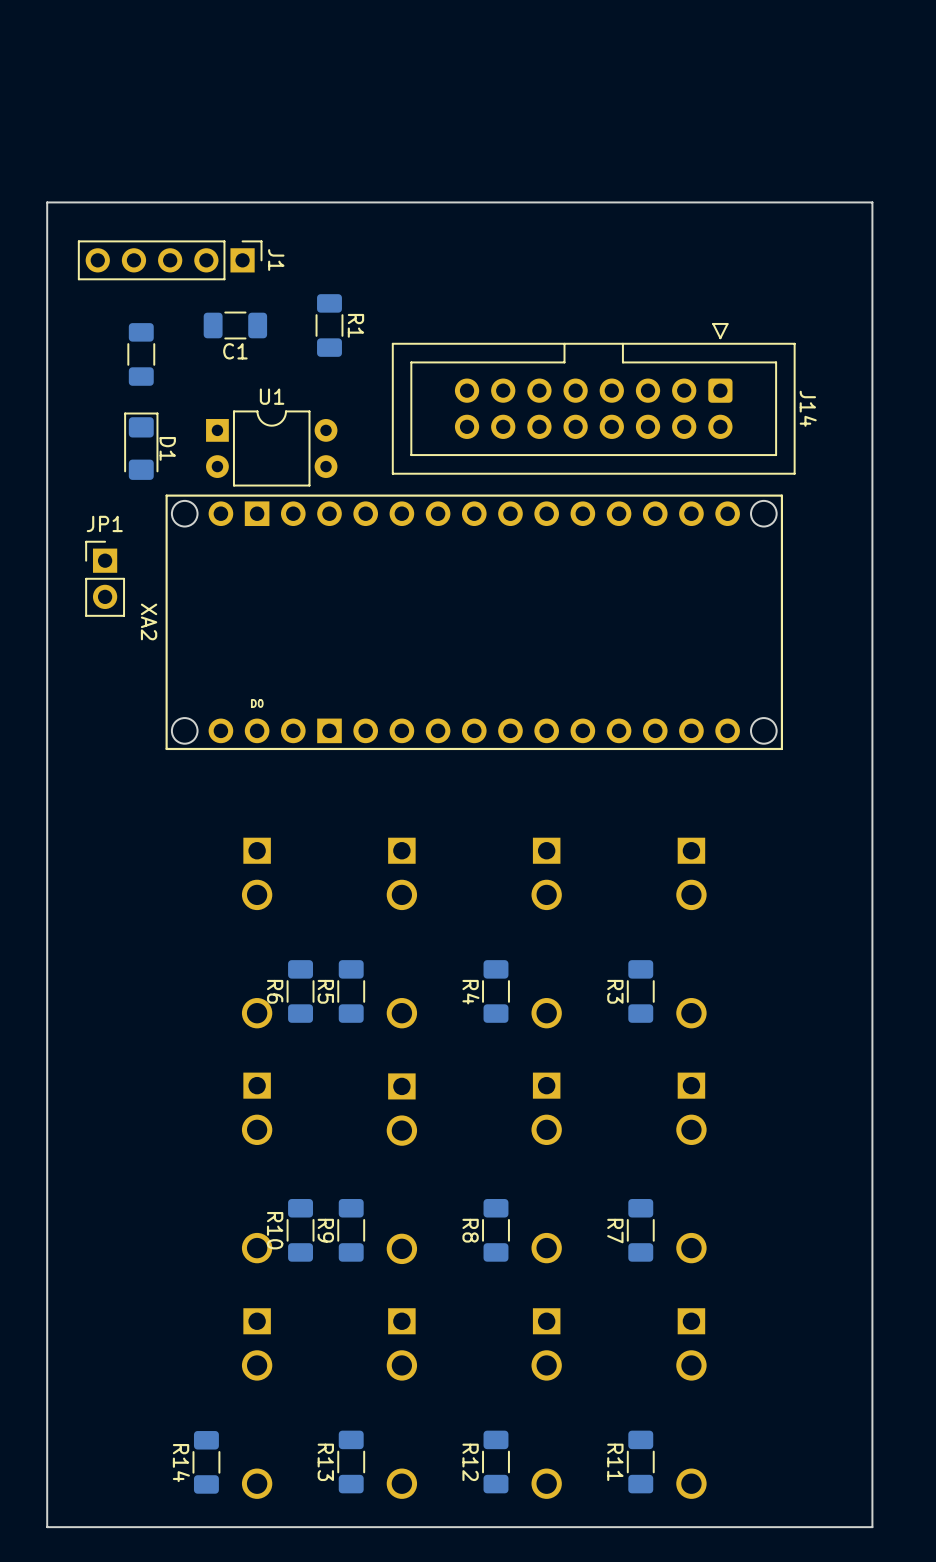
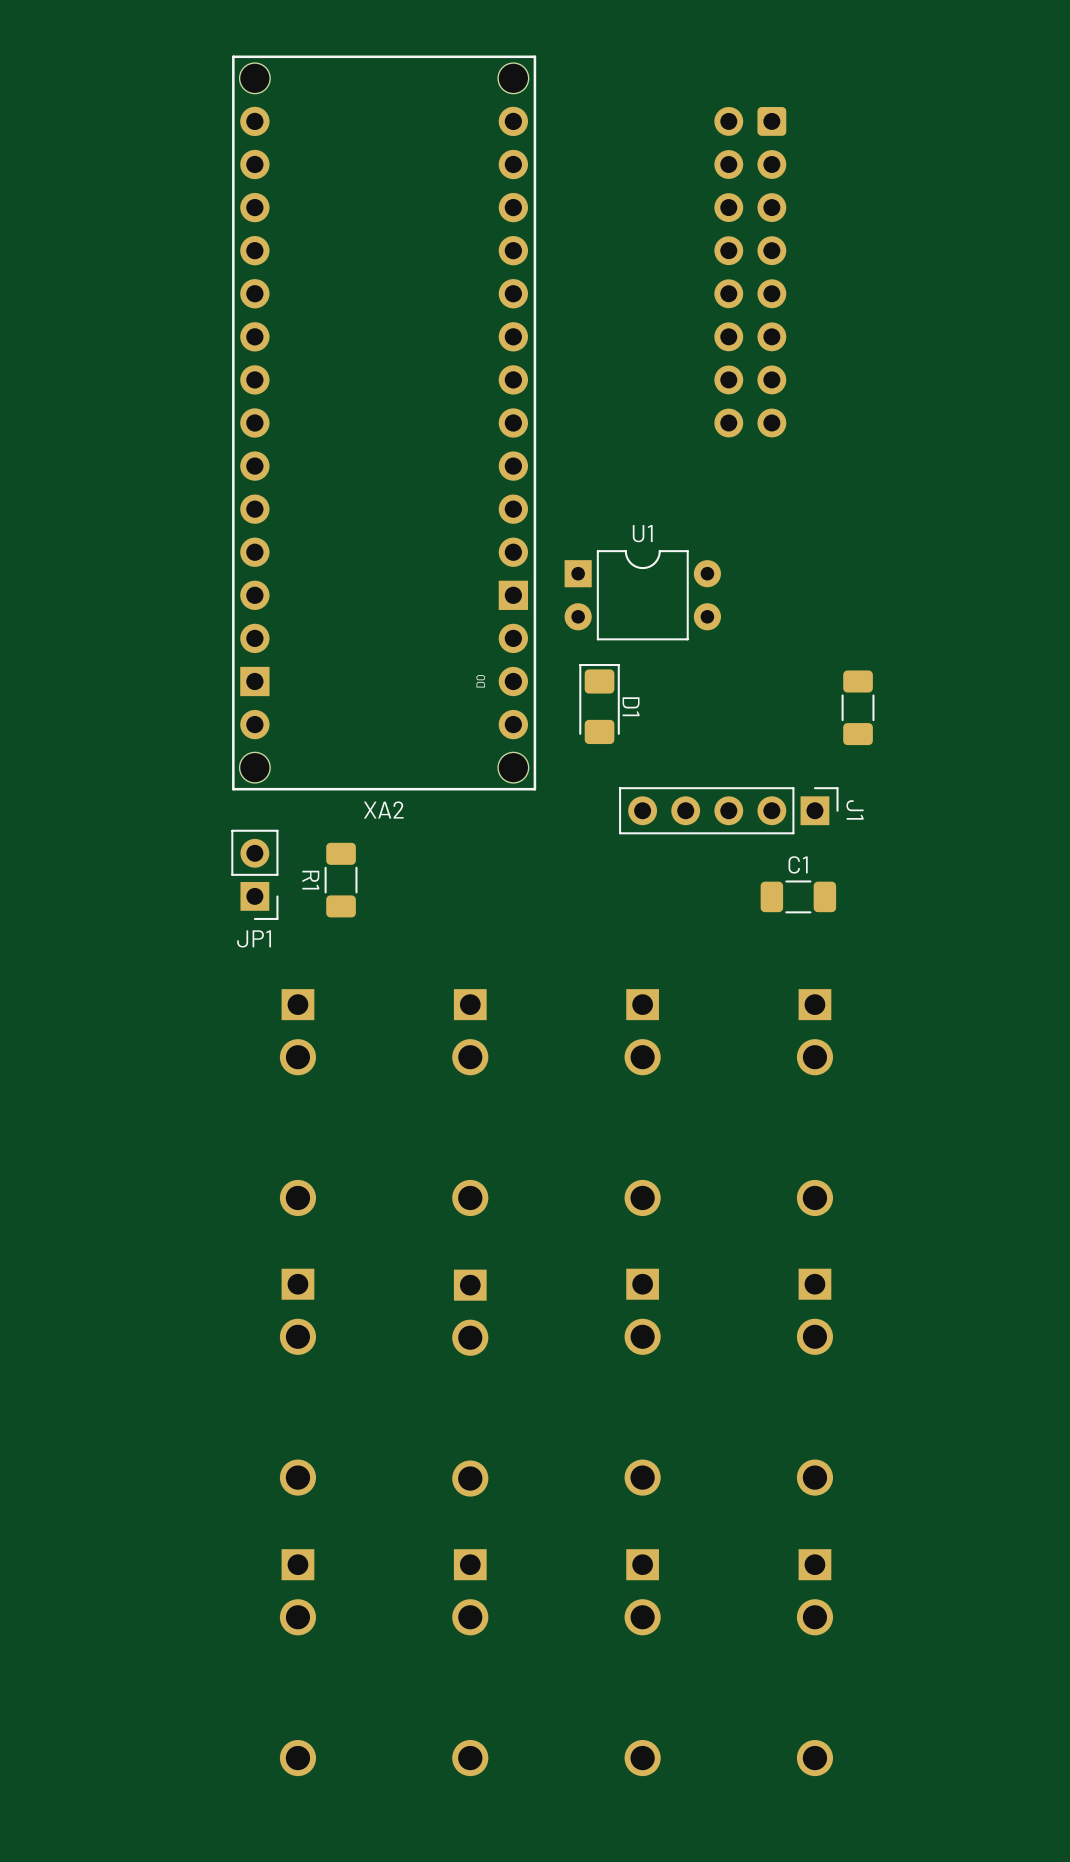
board edge: (872, 202) (47, 202) (47, 1527) (872, 1527) (872, 202) -> none
J1 position: (170, 260) -> (728, 810)
C1 position: (235, 325) -> (798, 896)
R1 position: (329, 325) -> (341, 880)
R1 name position: R1 (355, 325) -> R1 (310, 880)
C1 name position: C1 (235, 351) -> C1 (798, 864)
part: (141, 354) -> none
J14 side: bottom (593, 398) -> top (750, 272)
D1 position: (141, 446) -> (599, 704)
U1 position: (271, 448) -> (642, 595)
JP1 rotation: 0° (105, 578) -> 180° (254, 874)
JP1 position: (105, 578) -> (254, 874)
part: none -> (858, 707)
XA2 rotation: 0° (474, 622) -> 90° counterclockwise (384, 423)
R6: (300, 991) -> none
R5: (351, 991) -> none
R4: (495, 991) -> none
R3: (640, 991) -> none
R10: (300, 1230) -> none
R9: (351, 1230) -> none
R8: (495, 1230) -> none
R7: (640, 1230) -> none
R13: (351, 1461) -> none
R12: (495, 1461) -> none
R11: (640, 1461) -> none
R14: (206, 1462) -> none

